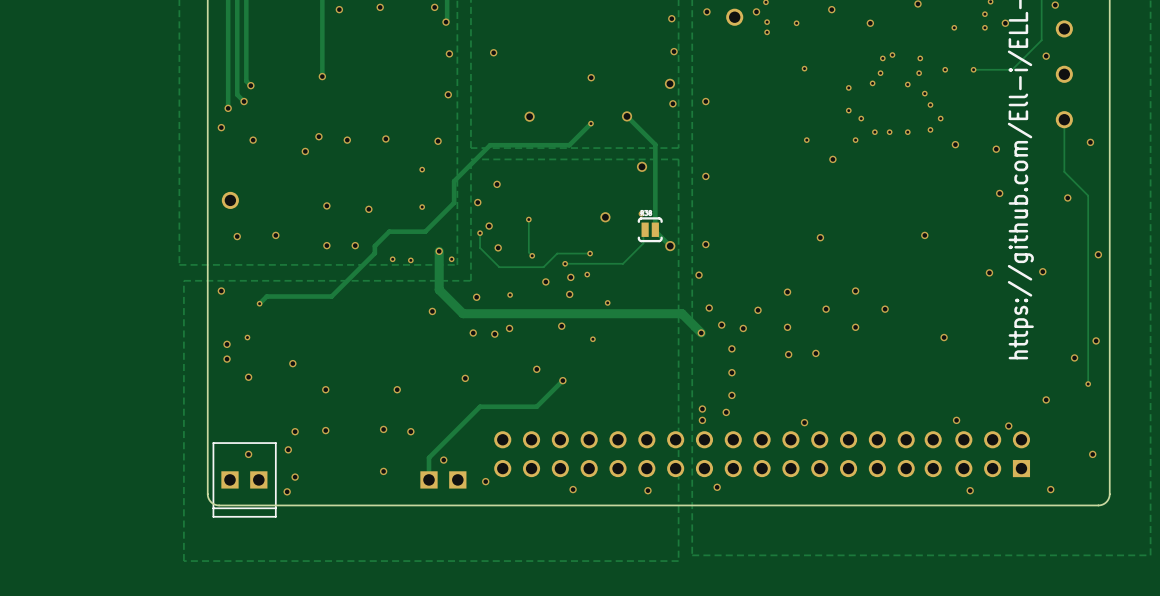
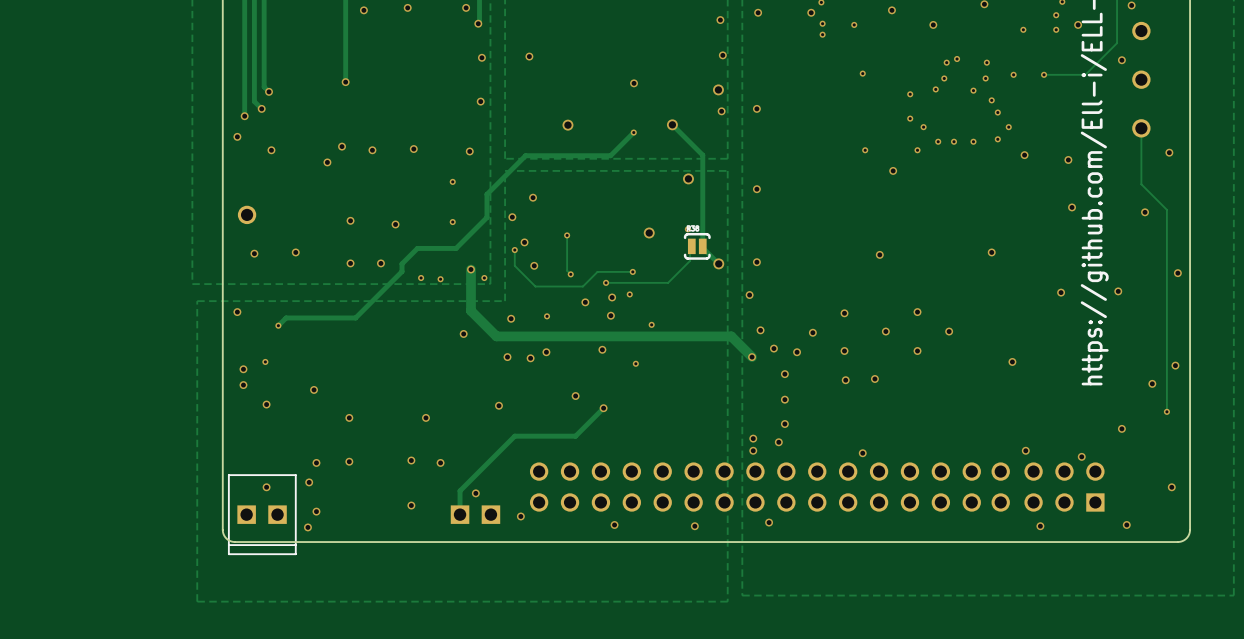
part: (734, 17) -> none

